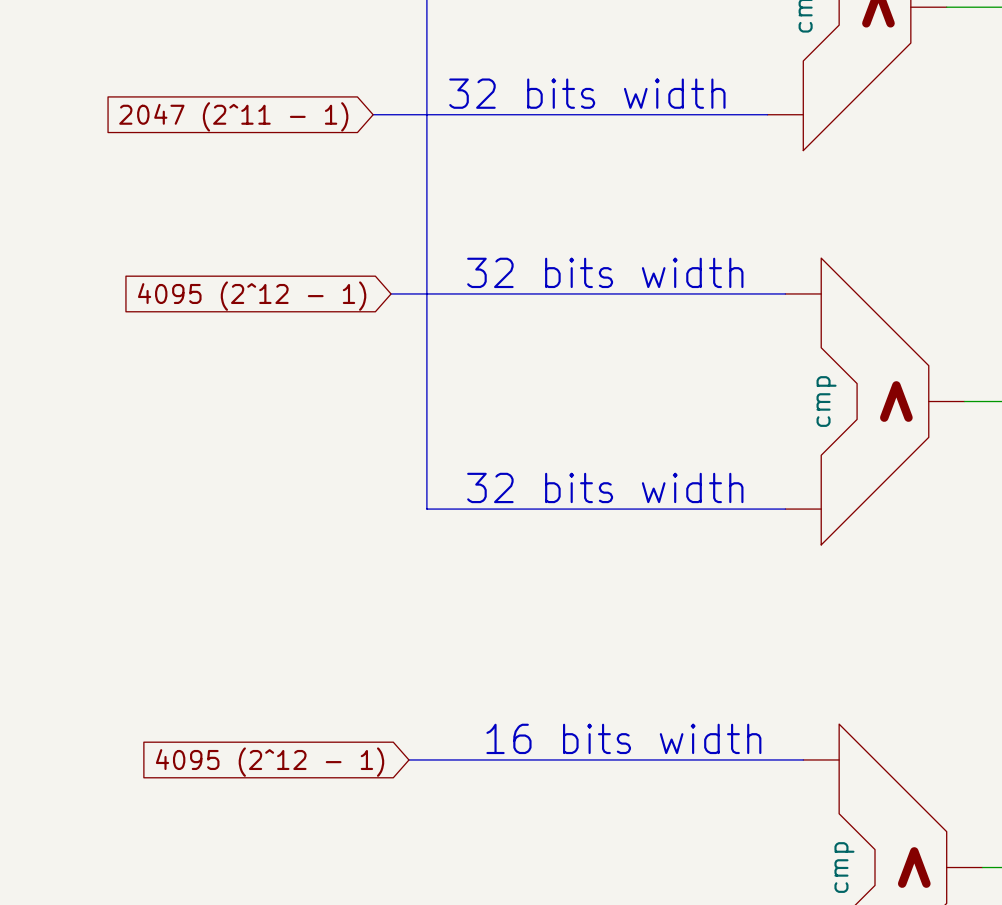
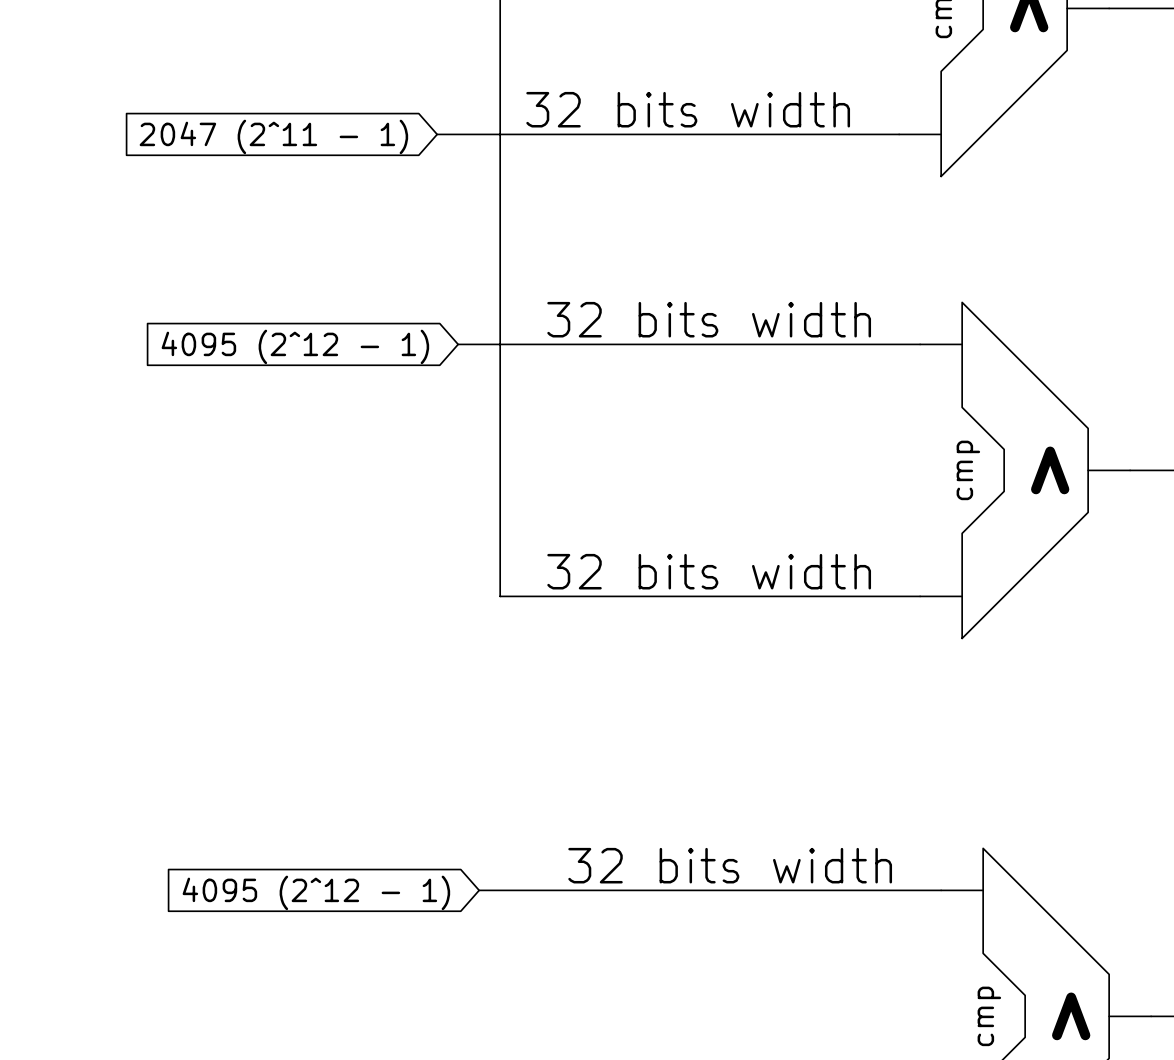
text: 16 bits width (623, 738) -> 32 bits width (730, 865)

